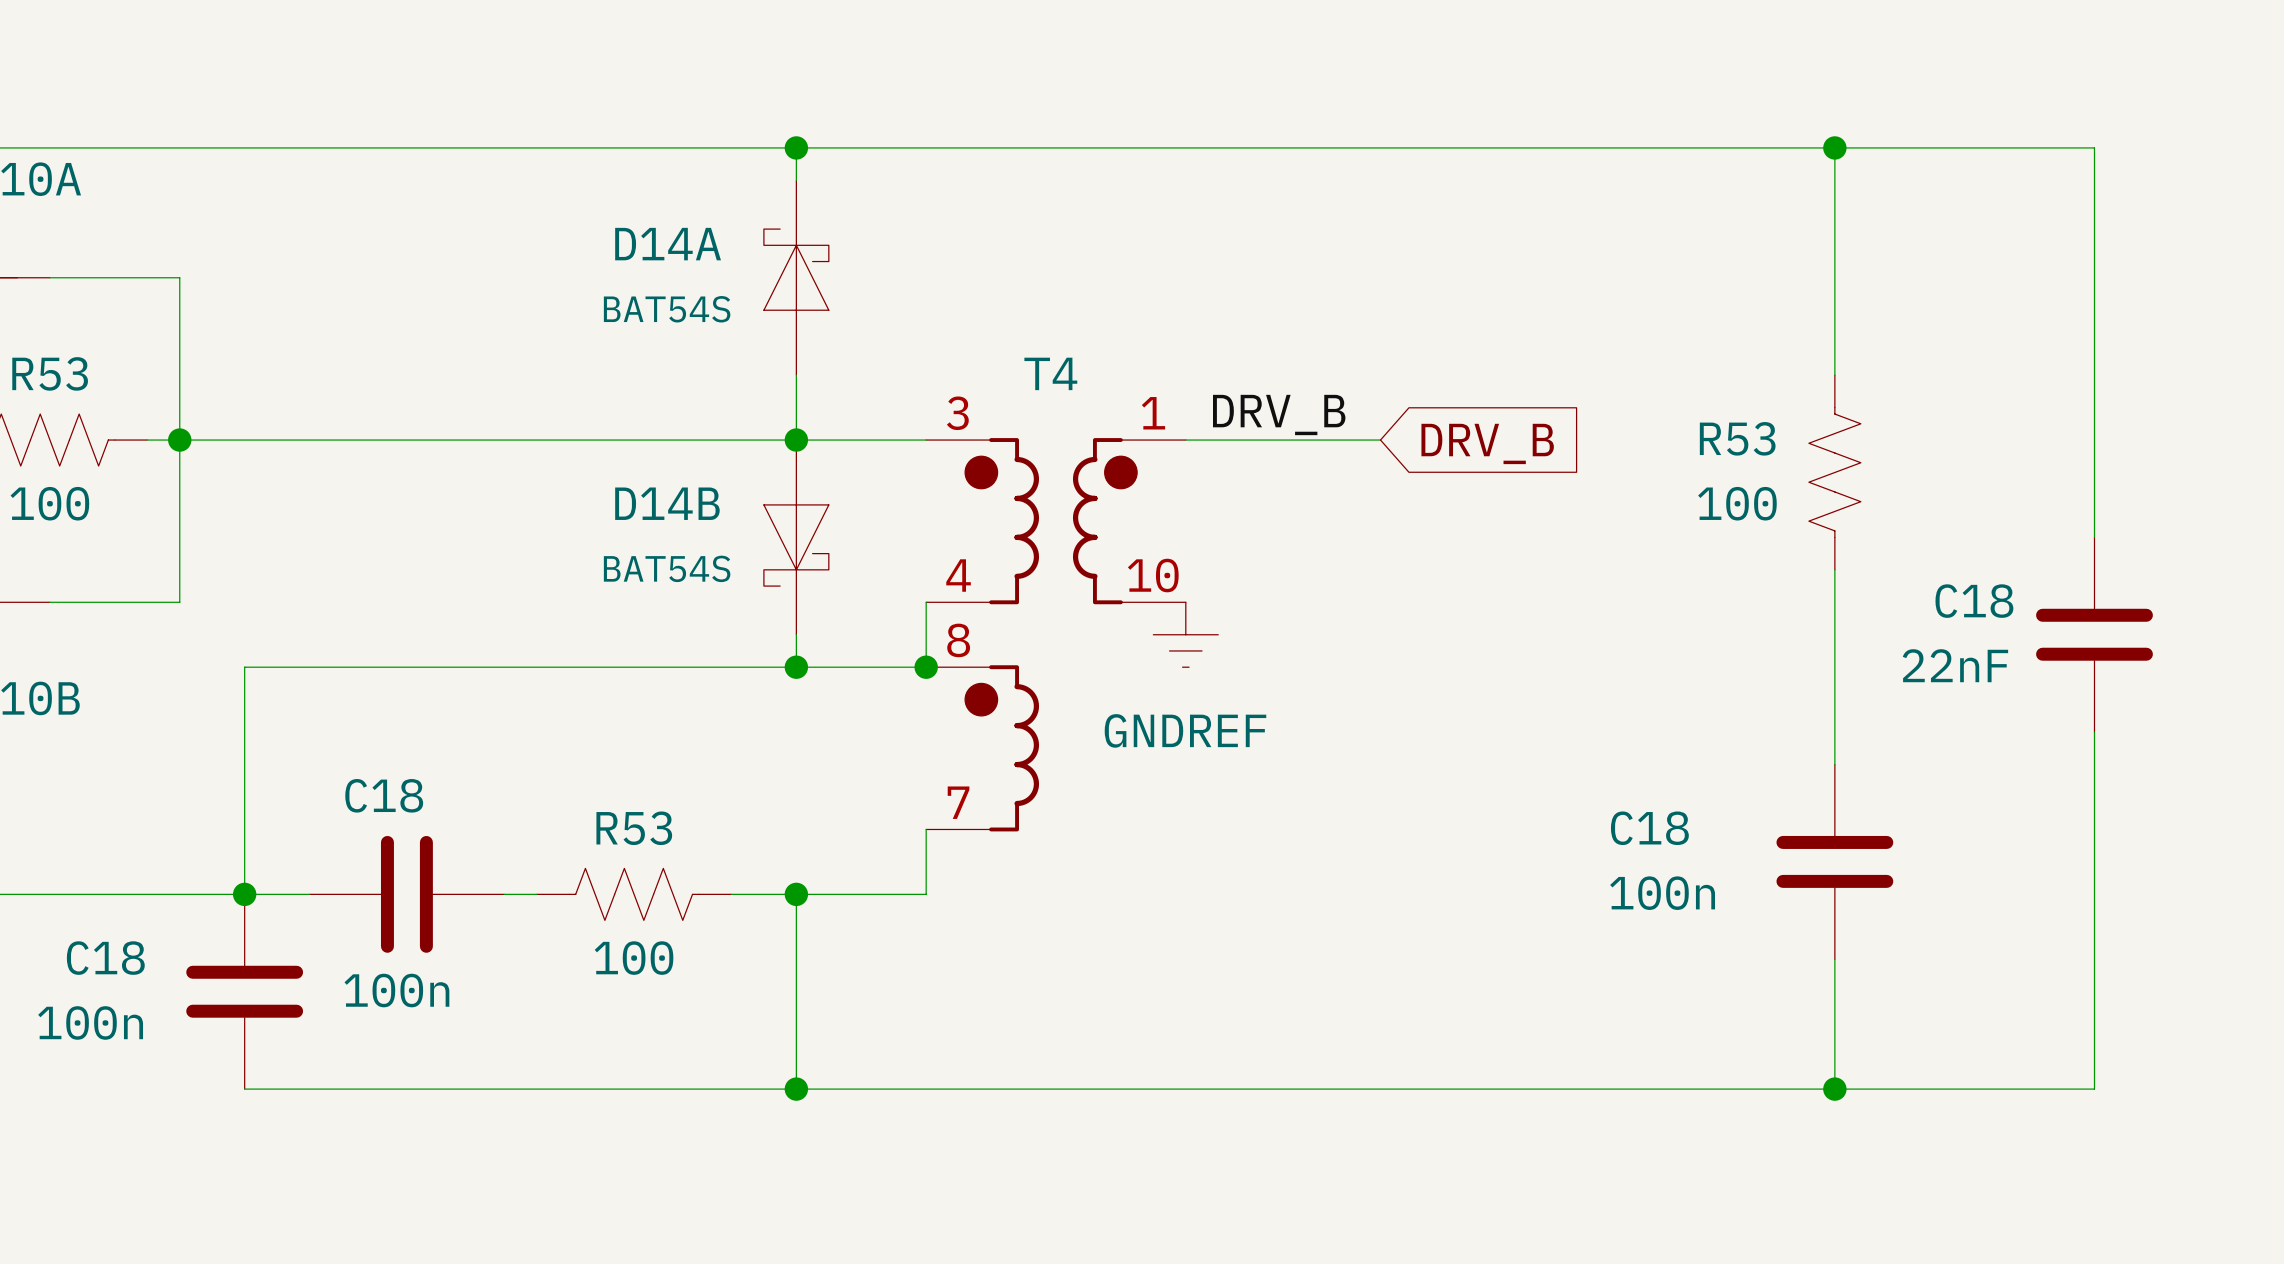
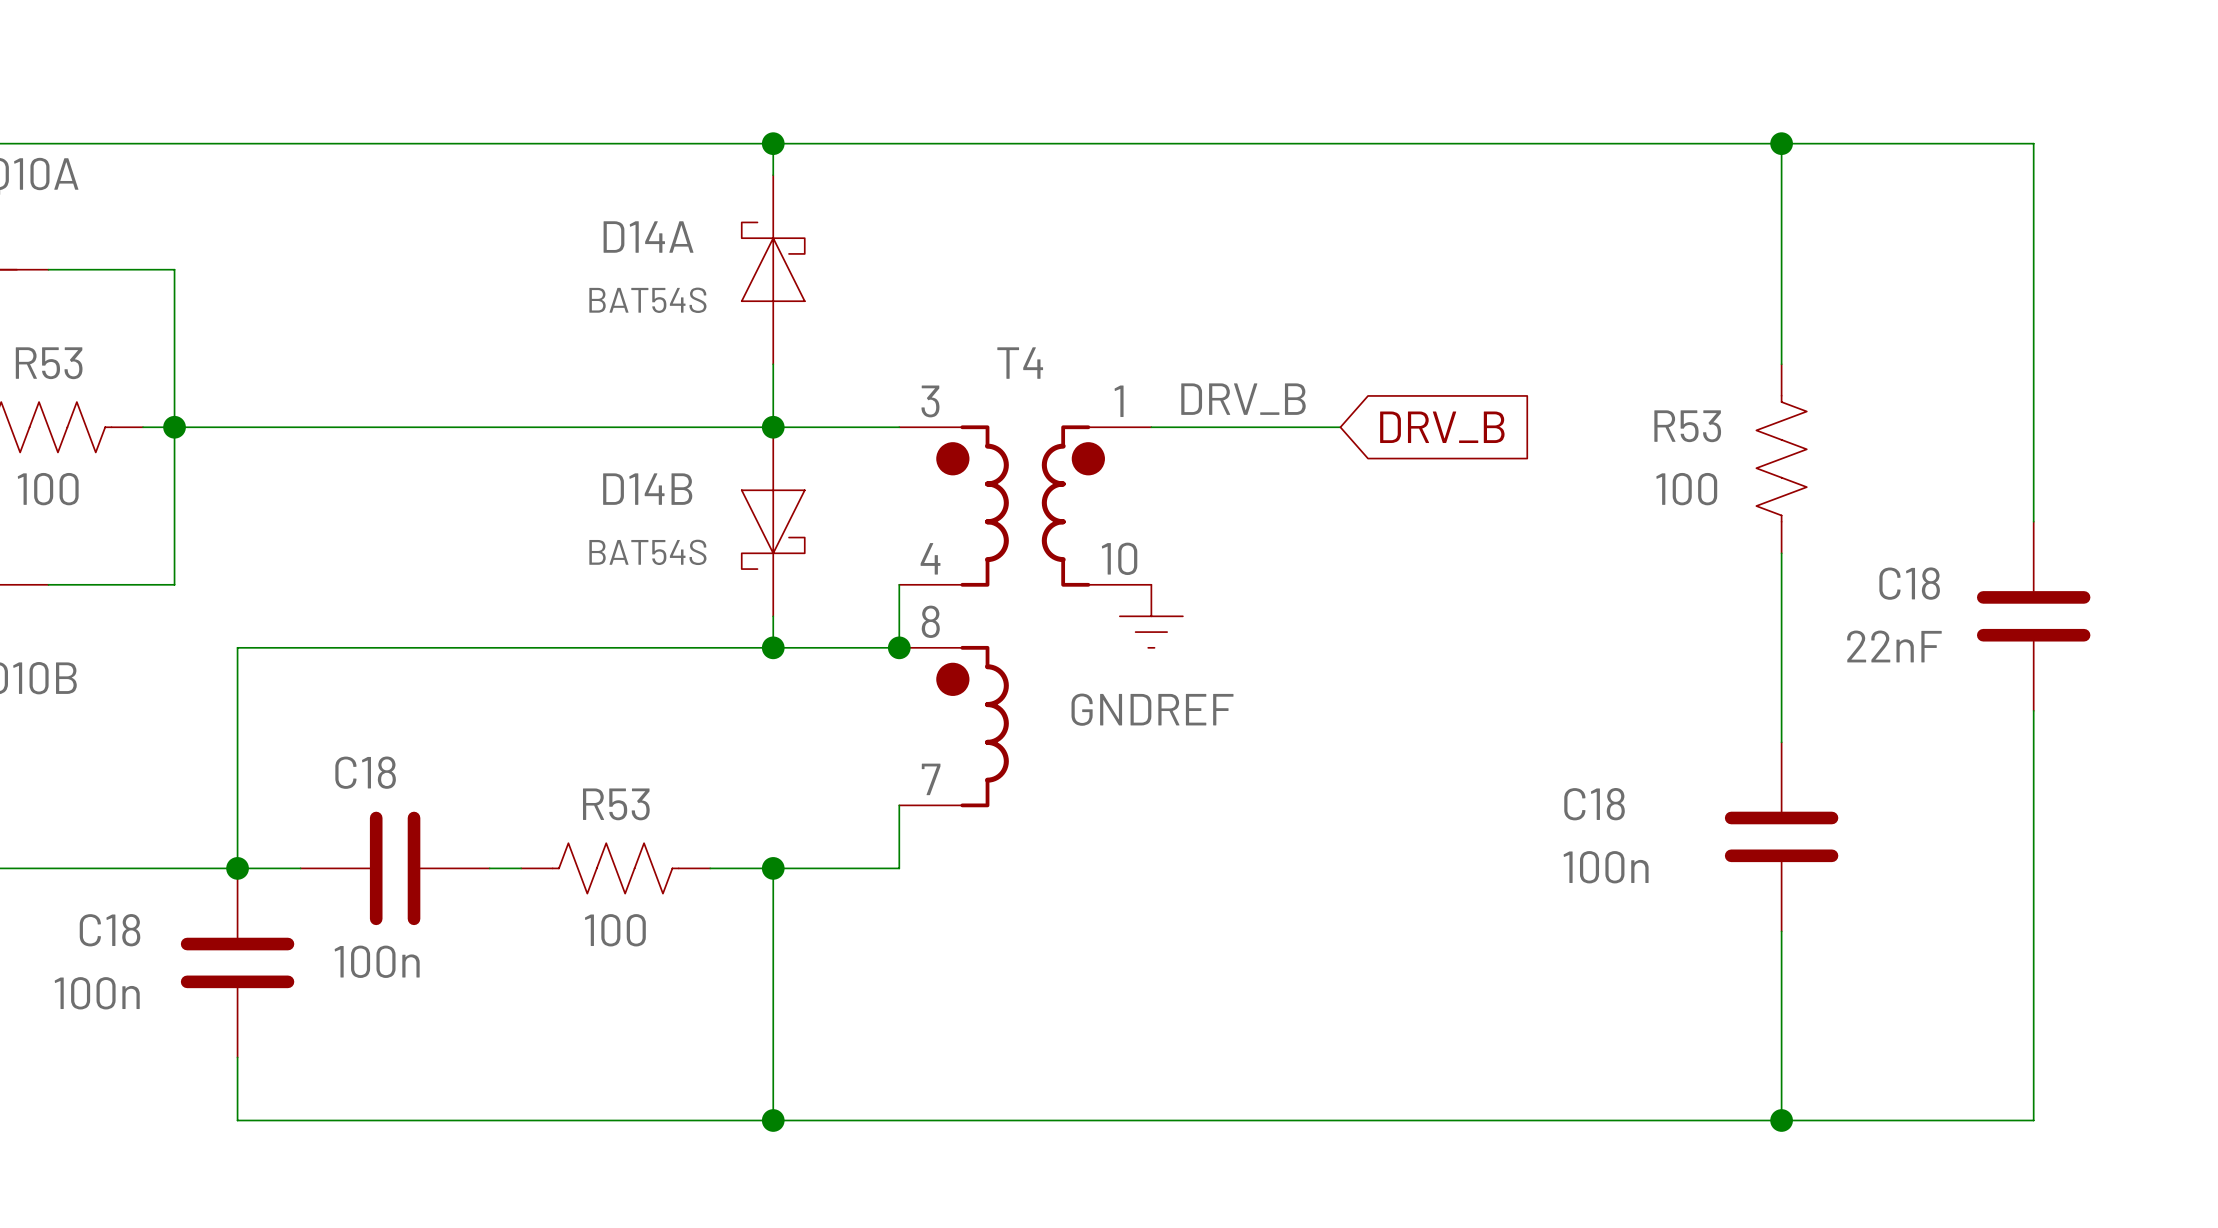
wire: (244, 1089) (2094, 1089) -> (237, 1057) (237, 1120) (2033, 1120) (2033, 1057)
wire: none -> (773, 1057) (773, 1120)
junction position: (796, 1089) -> (773, 1120)
wire: none -> (1781, 1057) (1781, 1120)
junction position: (1834, 1089) -> (1781, 1120)

